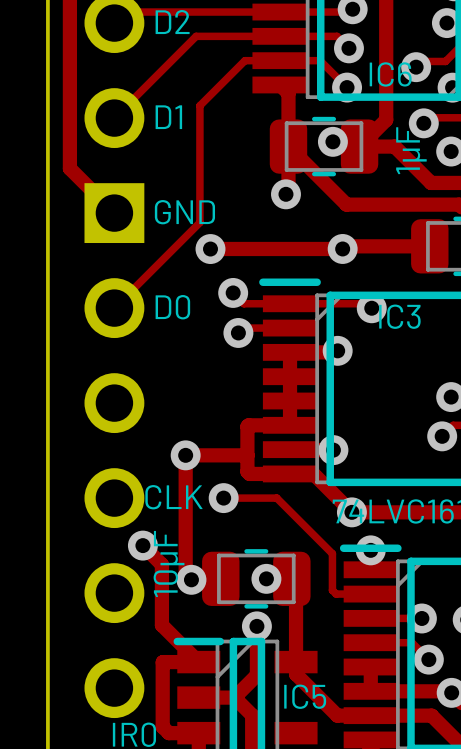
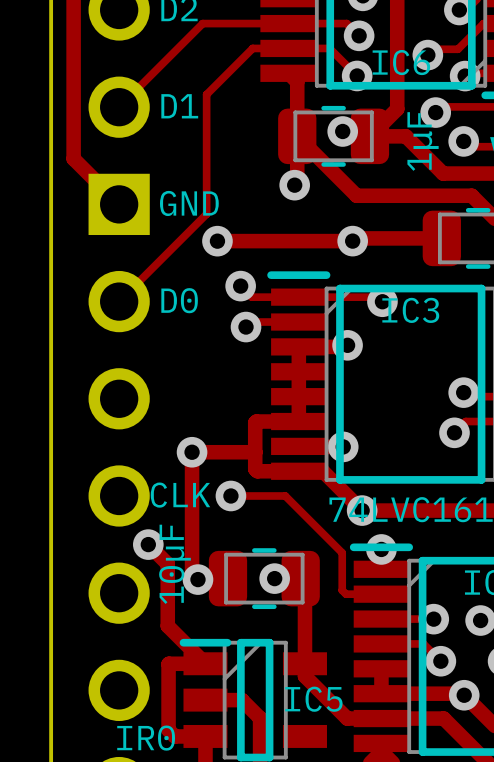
track: (256, 626) (256, 675) (234, 697) -> none
via: (256, 626) -> none

